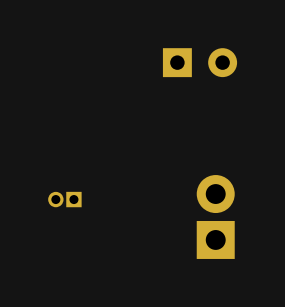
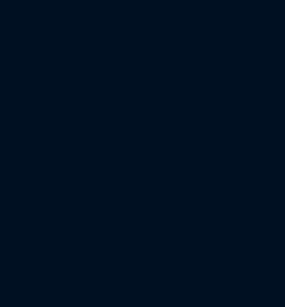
part: (200, 62) -> none
part: (64, 199) -> none
part: (215, 217) -> none

